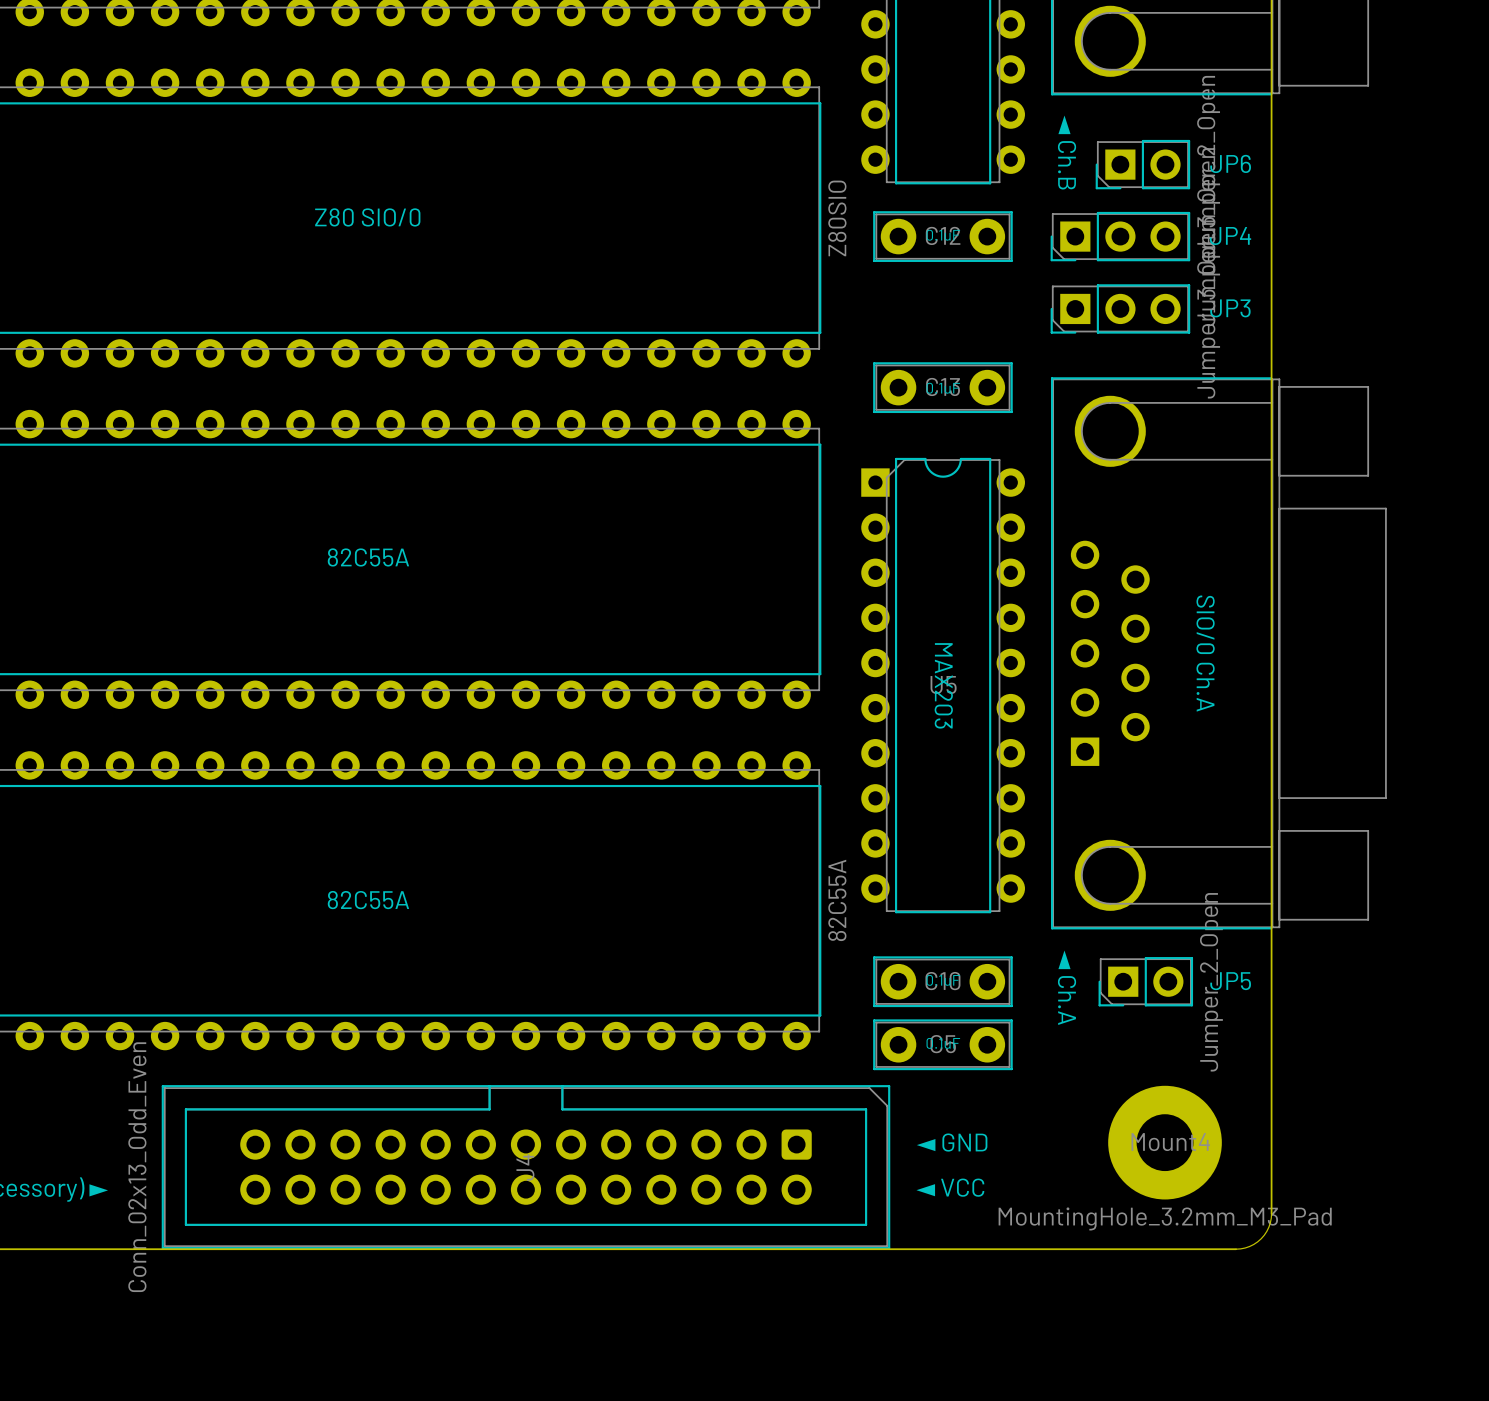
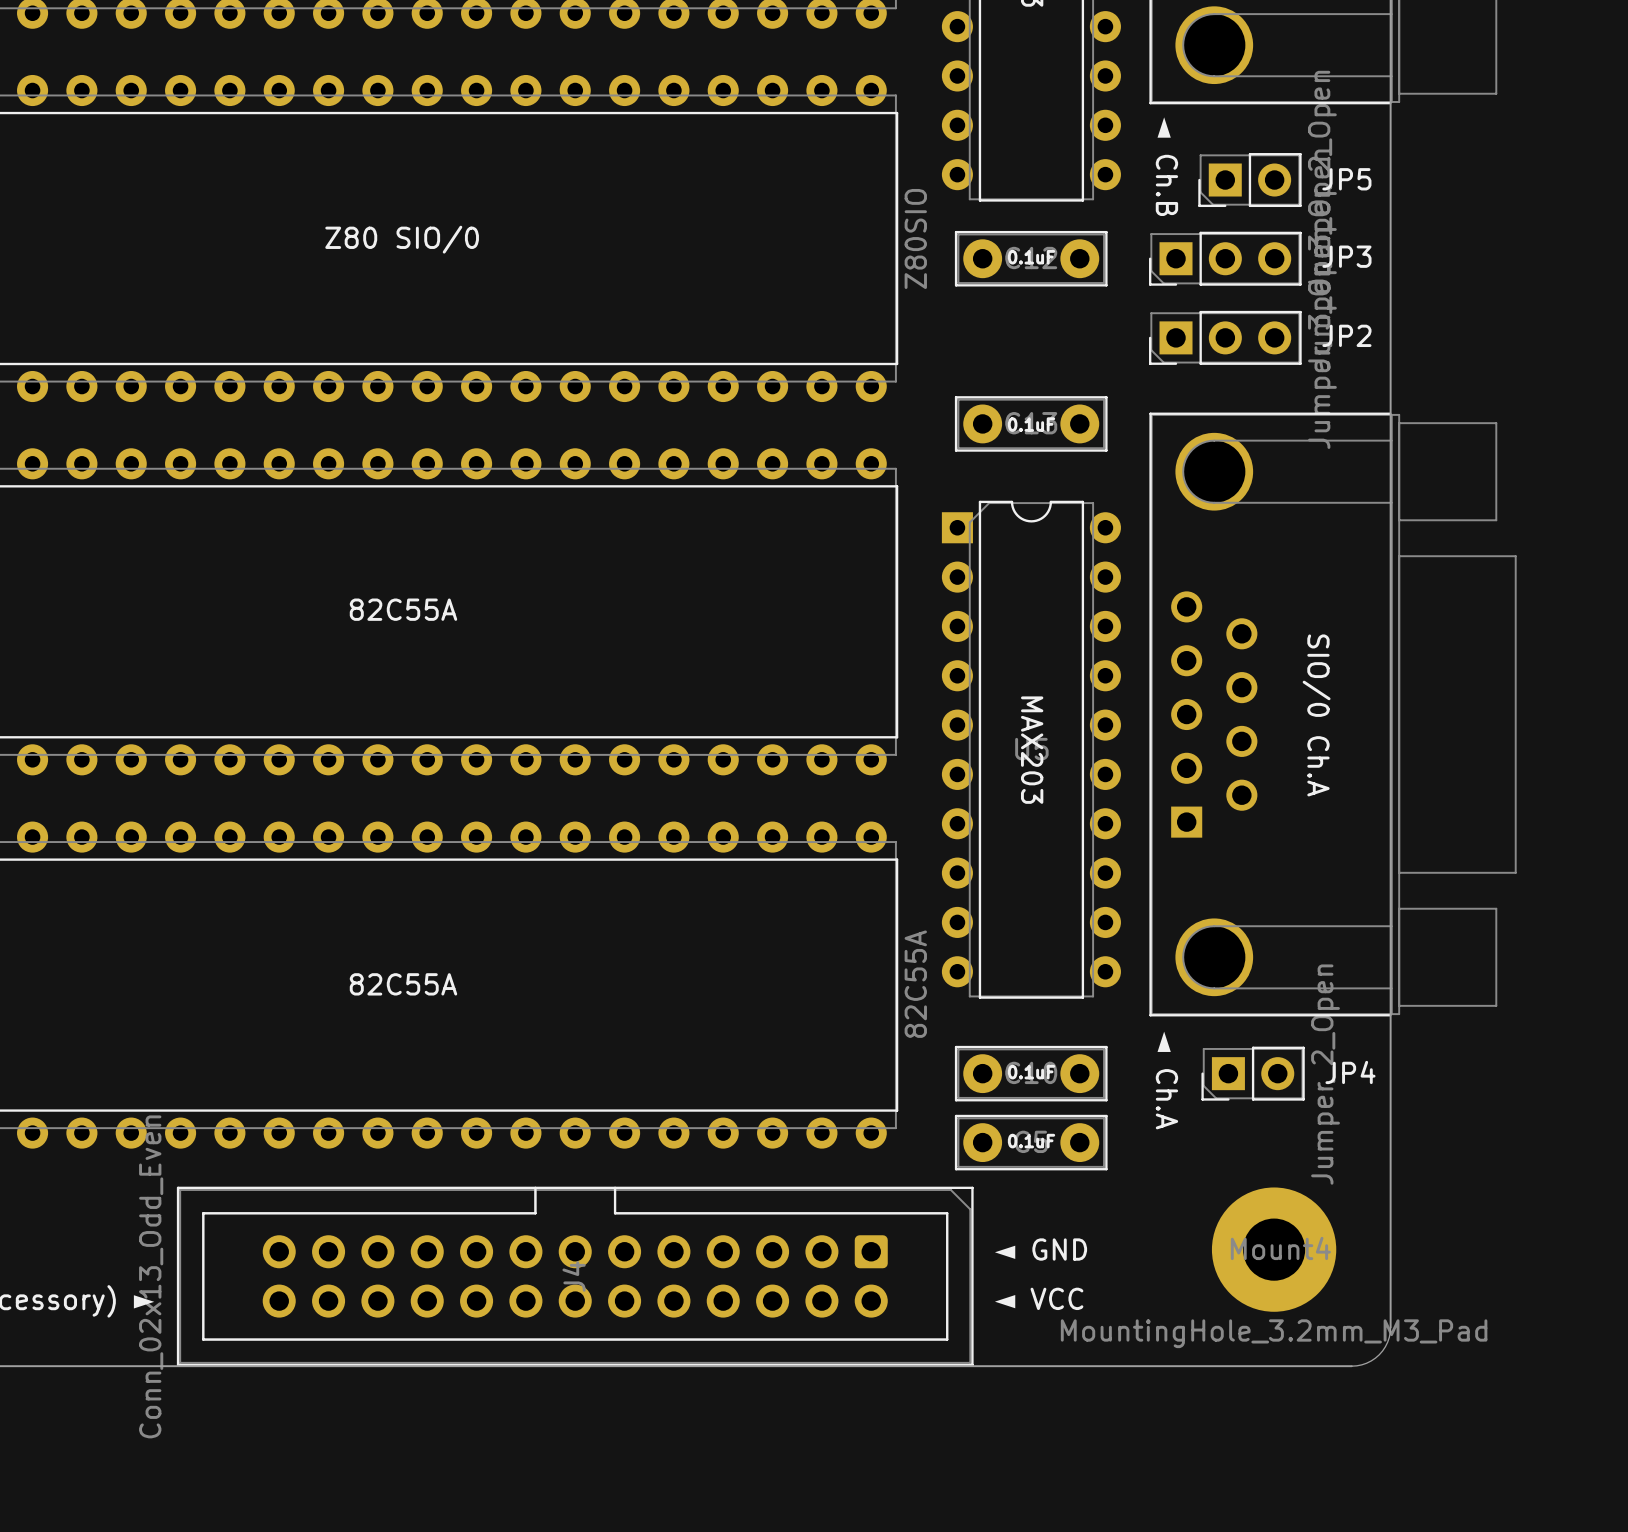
JP6 name: JP6 (1230, 163) -> JP5 (1346, 179)
JP4 name: JP4 (1230, 236) -> JP3 (1346, 256)
JP3 name: JP3 (1230, 308) -> JP2 (1346, 335)
JP5 name: JP5 (1230, 981) -> JP4 (1350, 1072)

